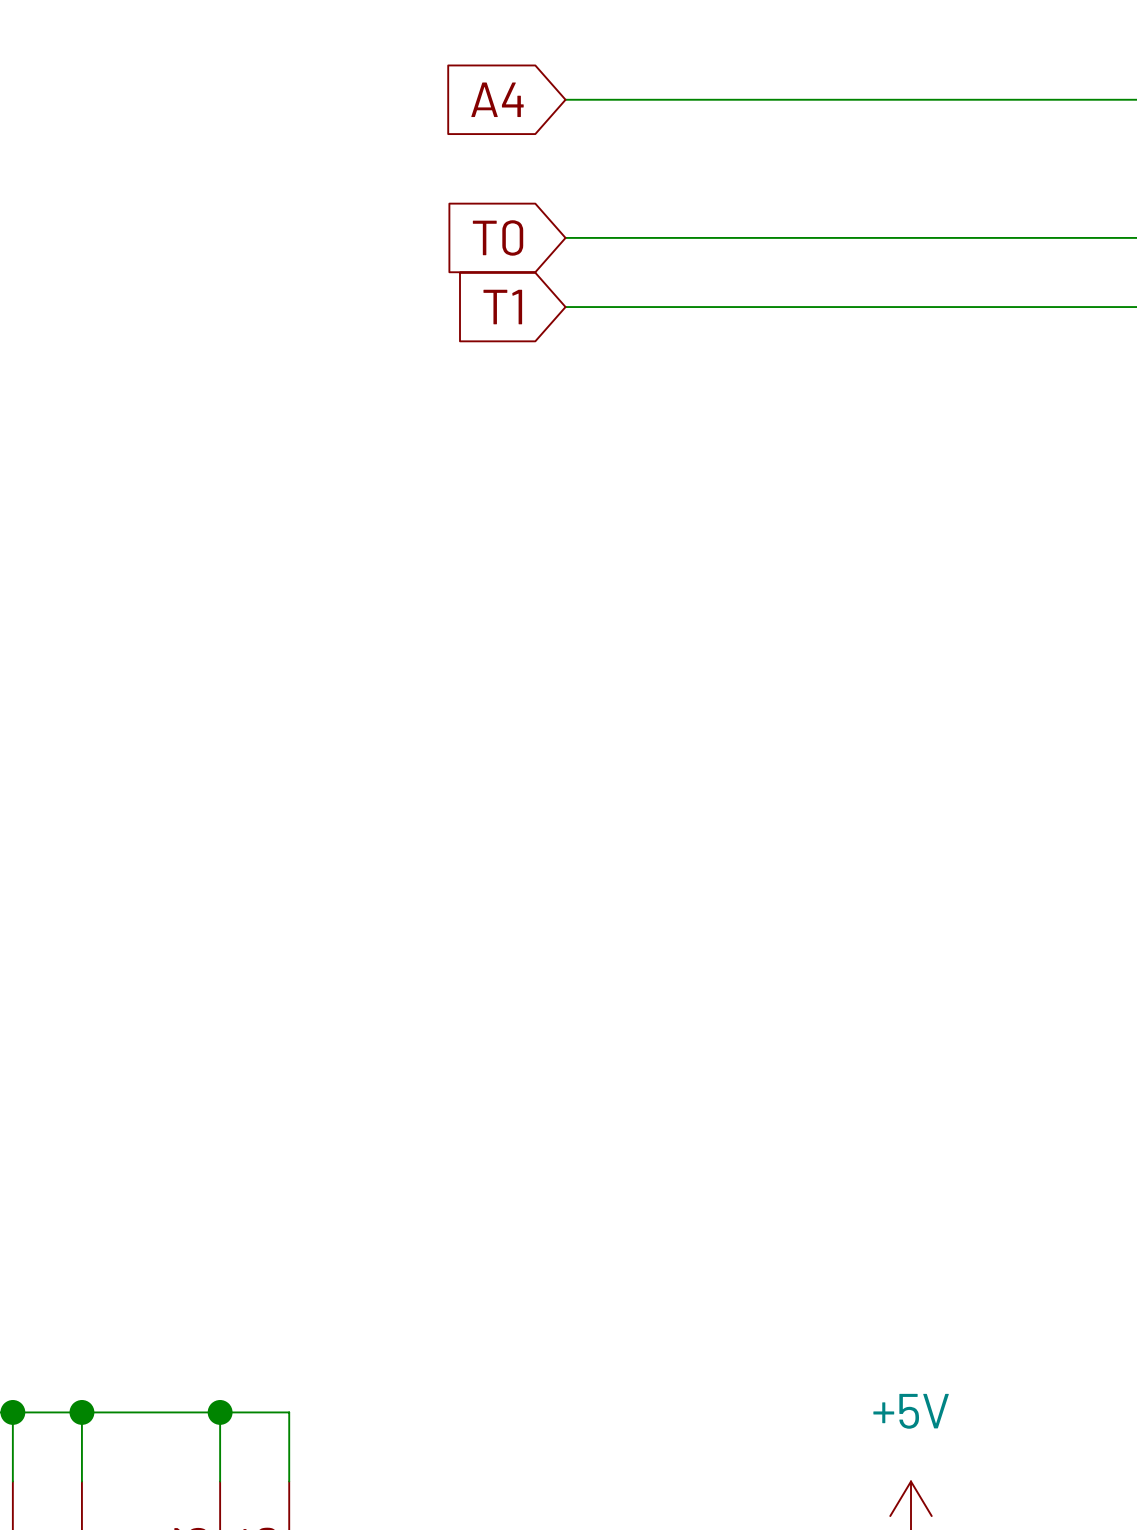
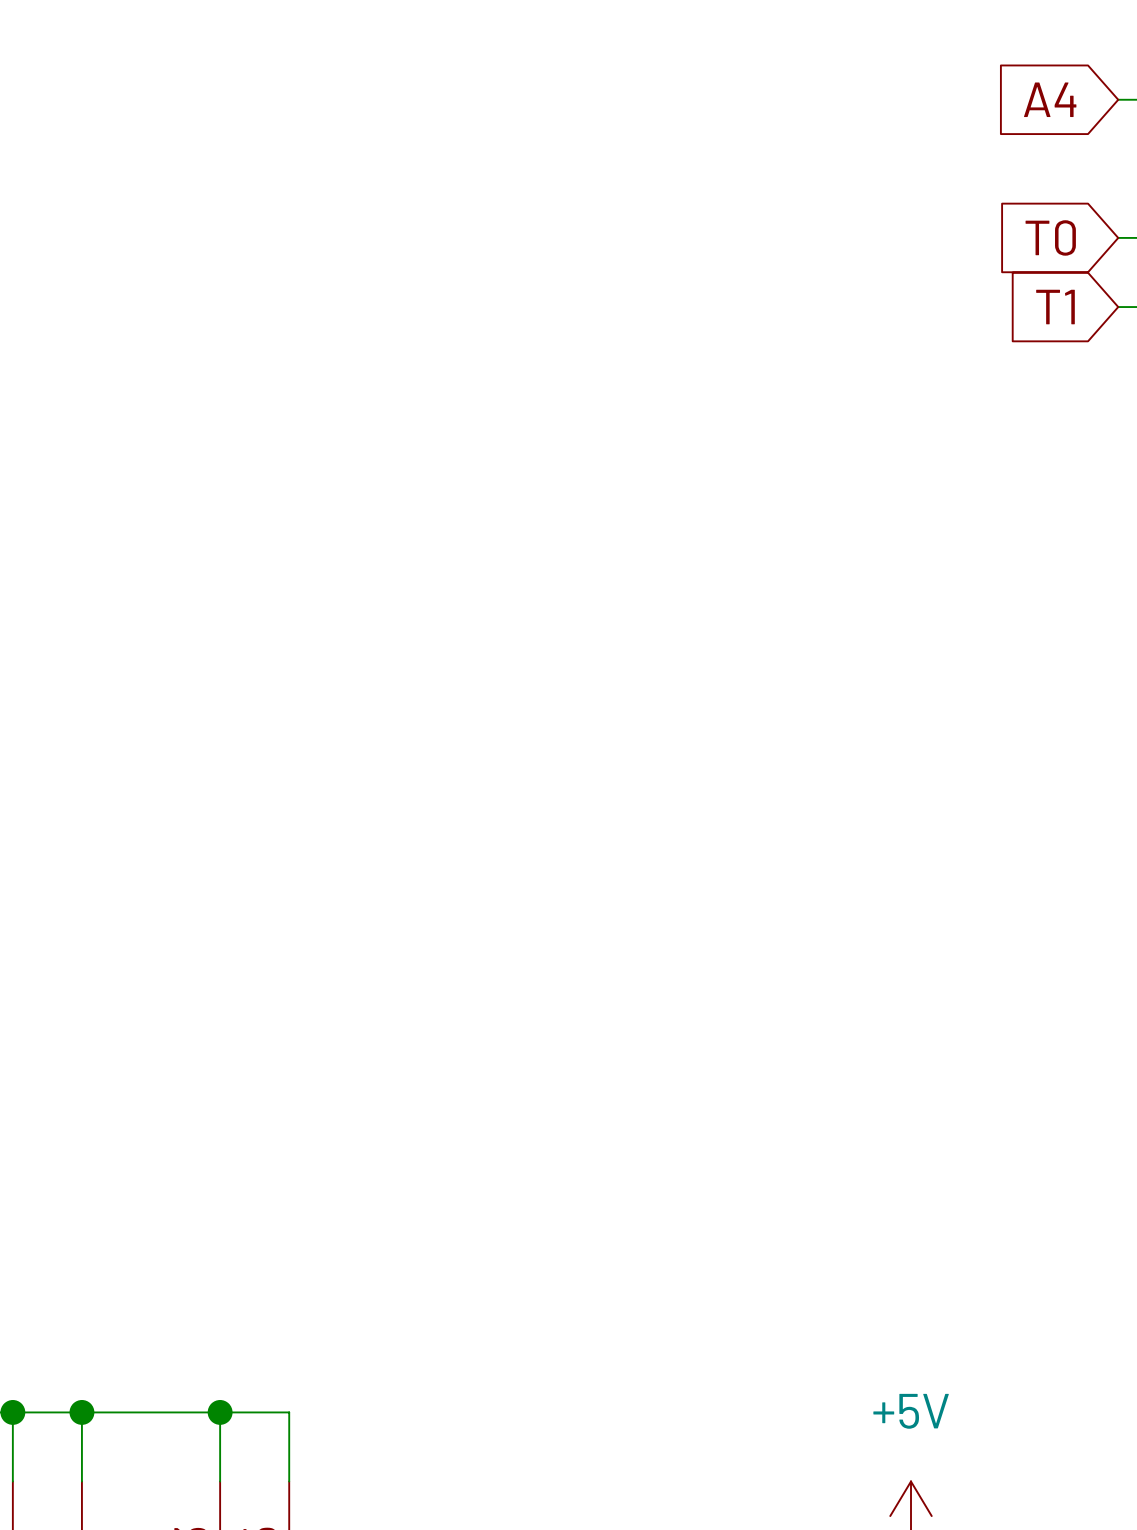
global label position: A4 (497, 99) -> A4 (1050, 99)
wire: (565, 99) (1118, 99) -> none
global label position: T0 (498, 237) -> T0 (1050, 237)
wire: (565, 237) (1118, 237) -> none
global label position: T1 (502, 307) -> T1 (1055, 307)
wire: (565, 307) (1118, 307) -> none

